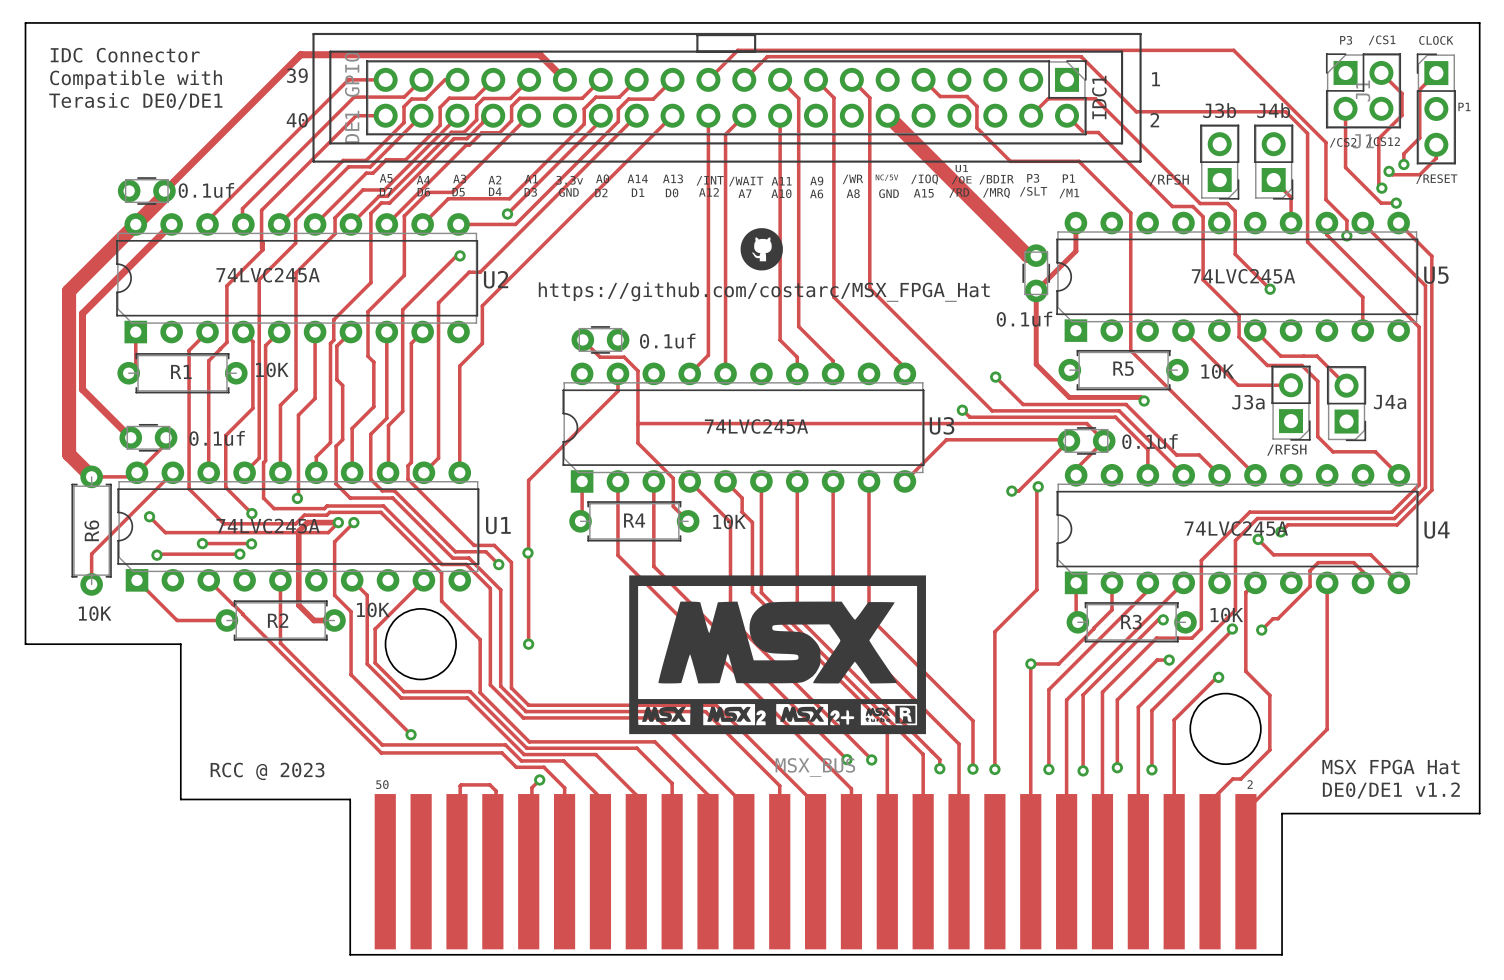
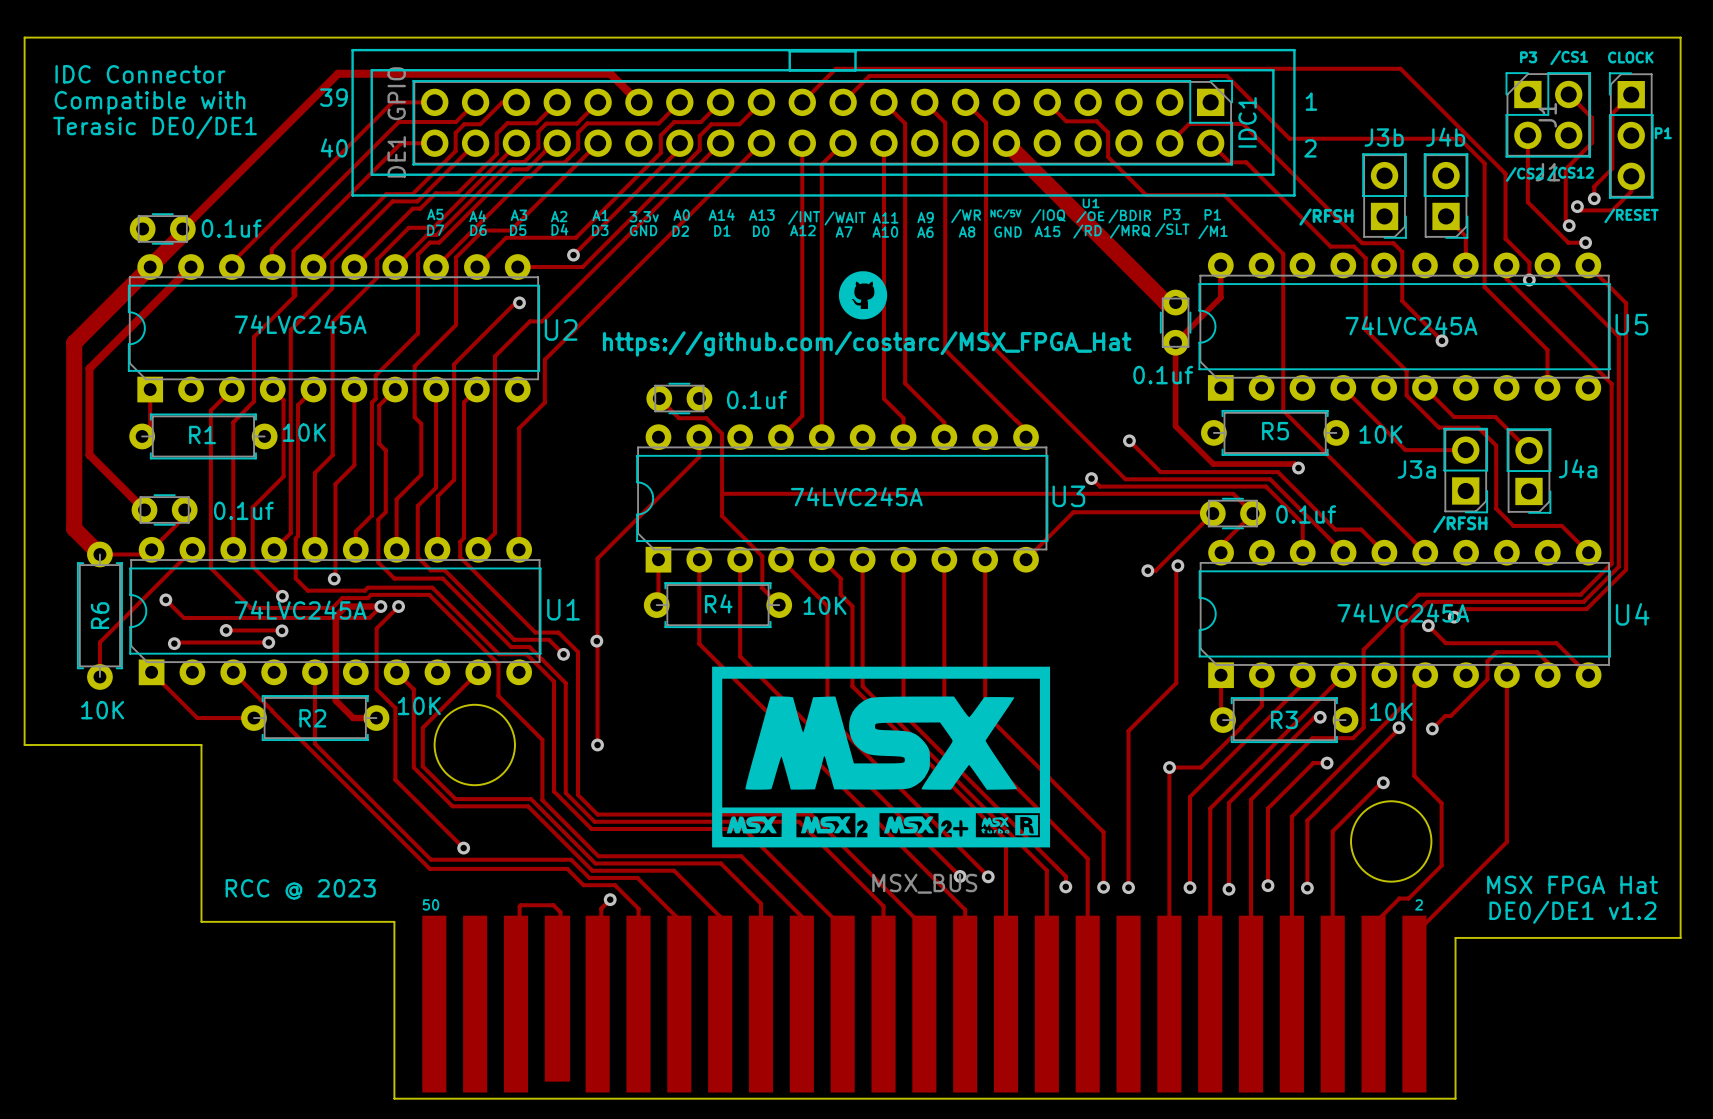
part footprint: [24, 22, 1481, 956] -> [23, 36, 1682, 1100]

